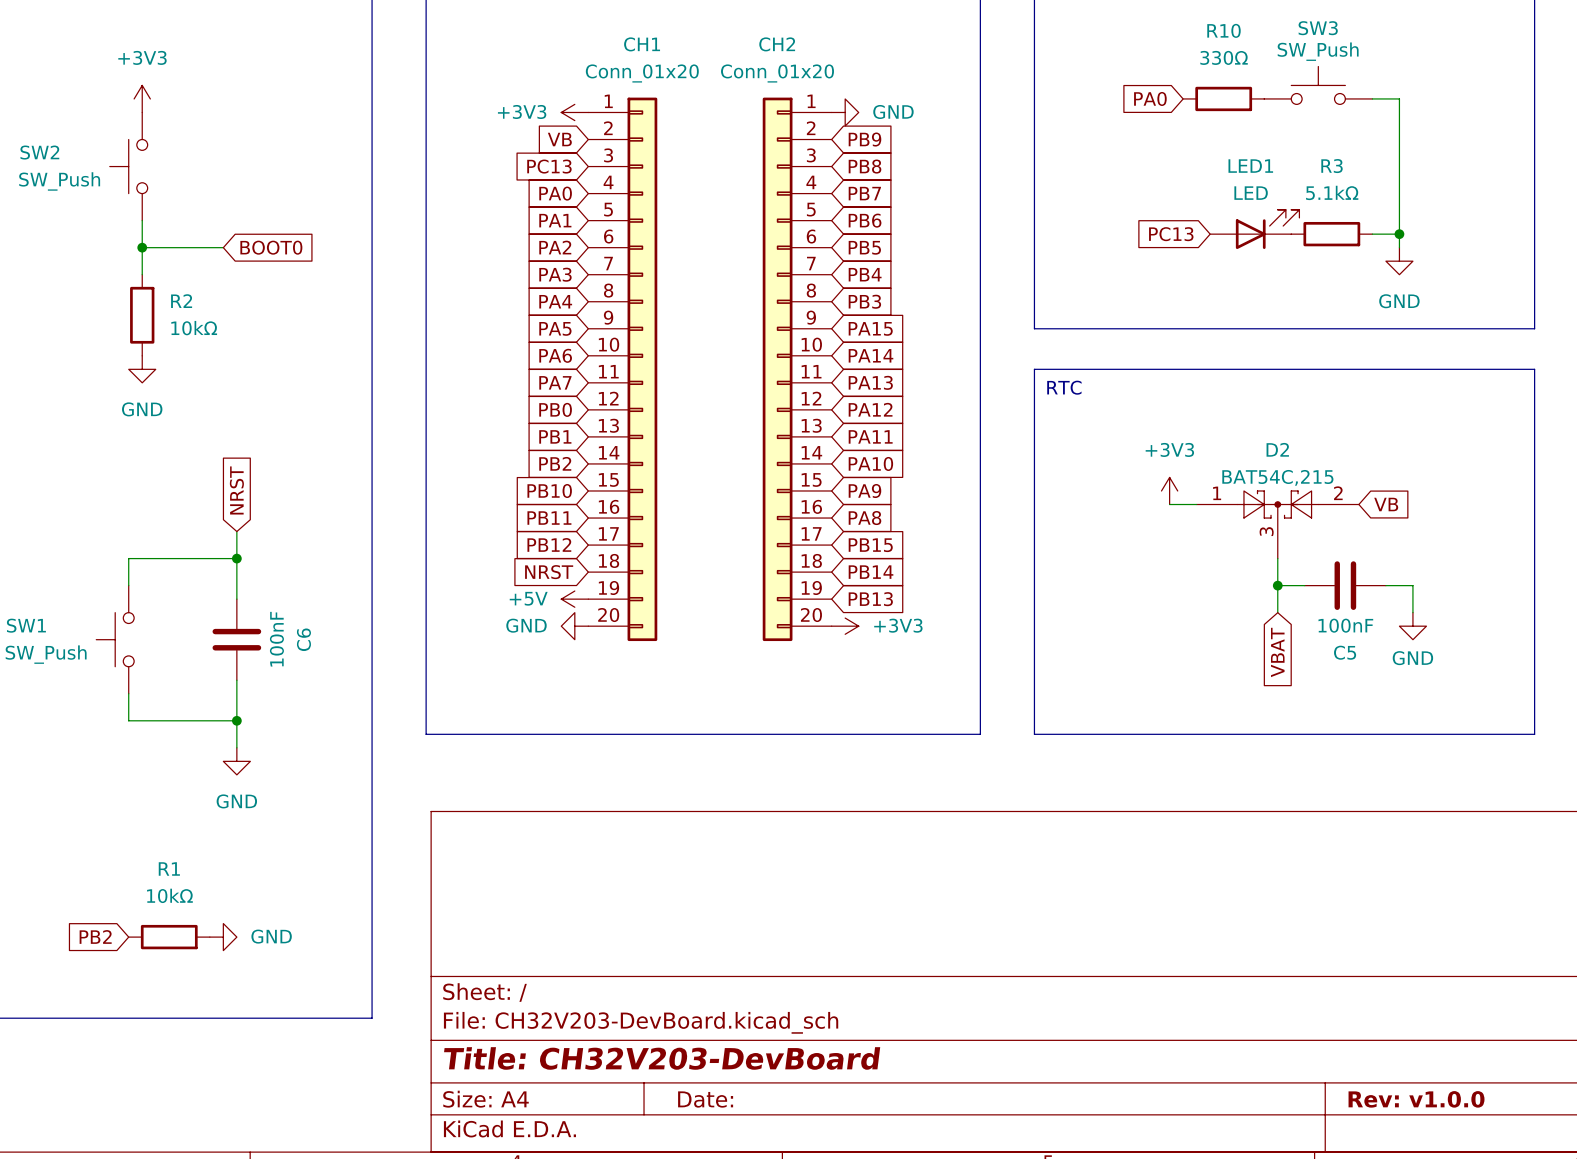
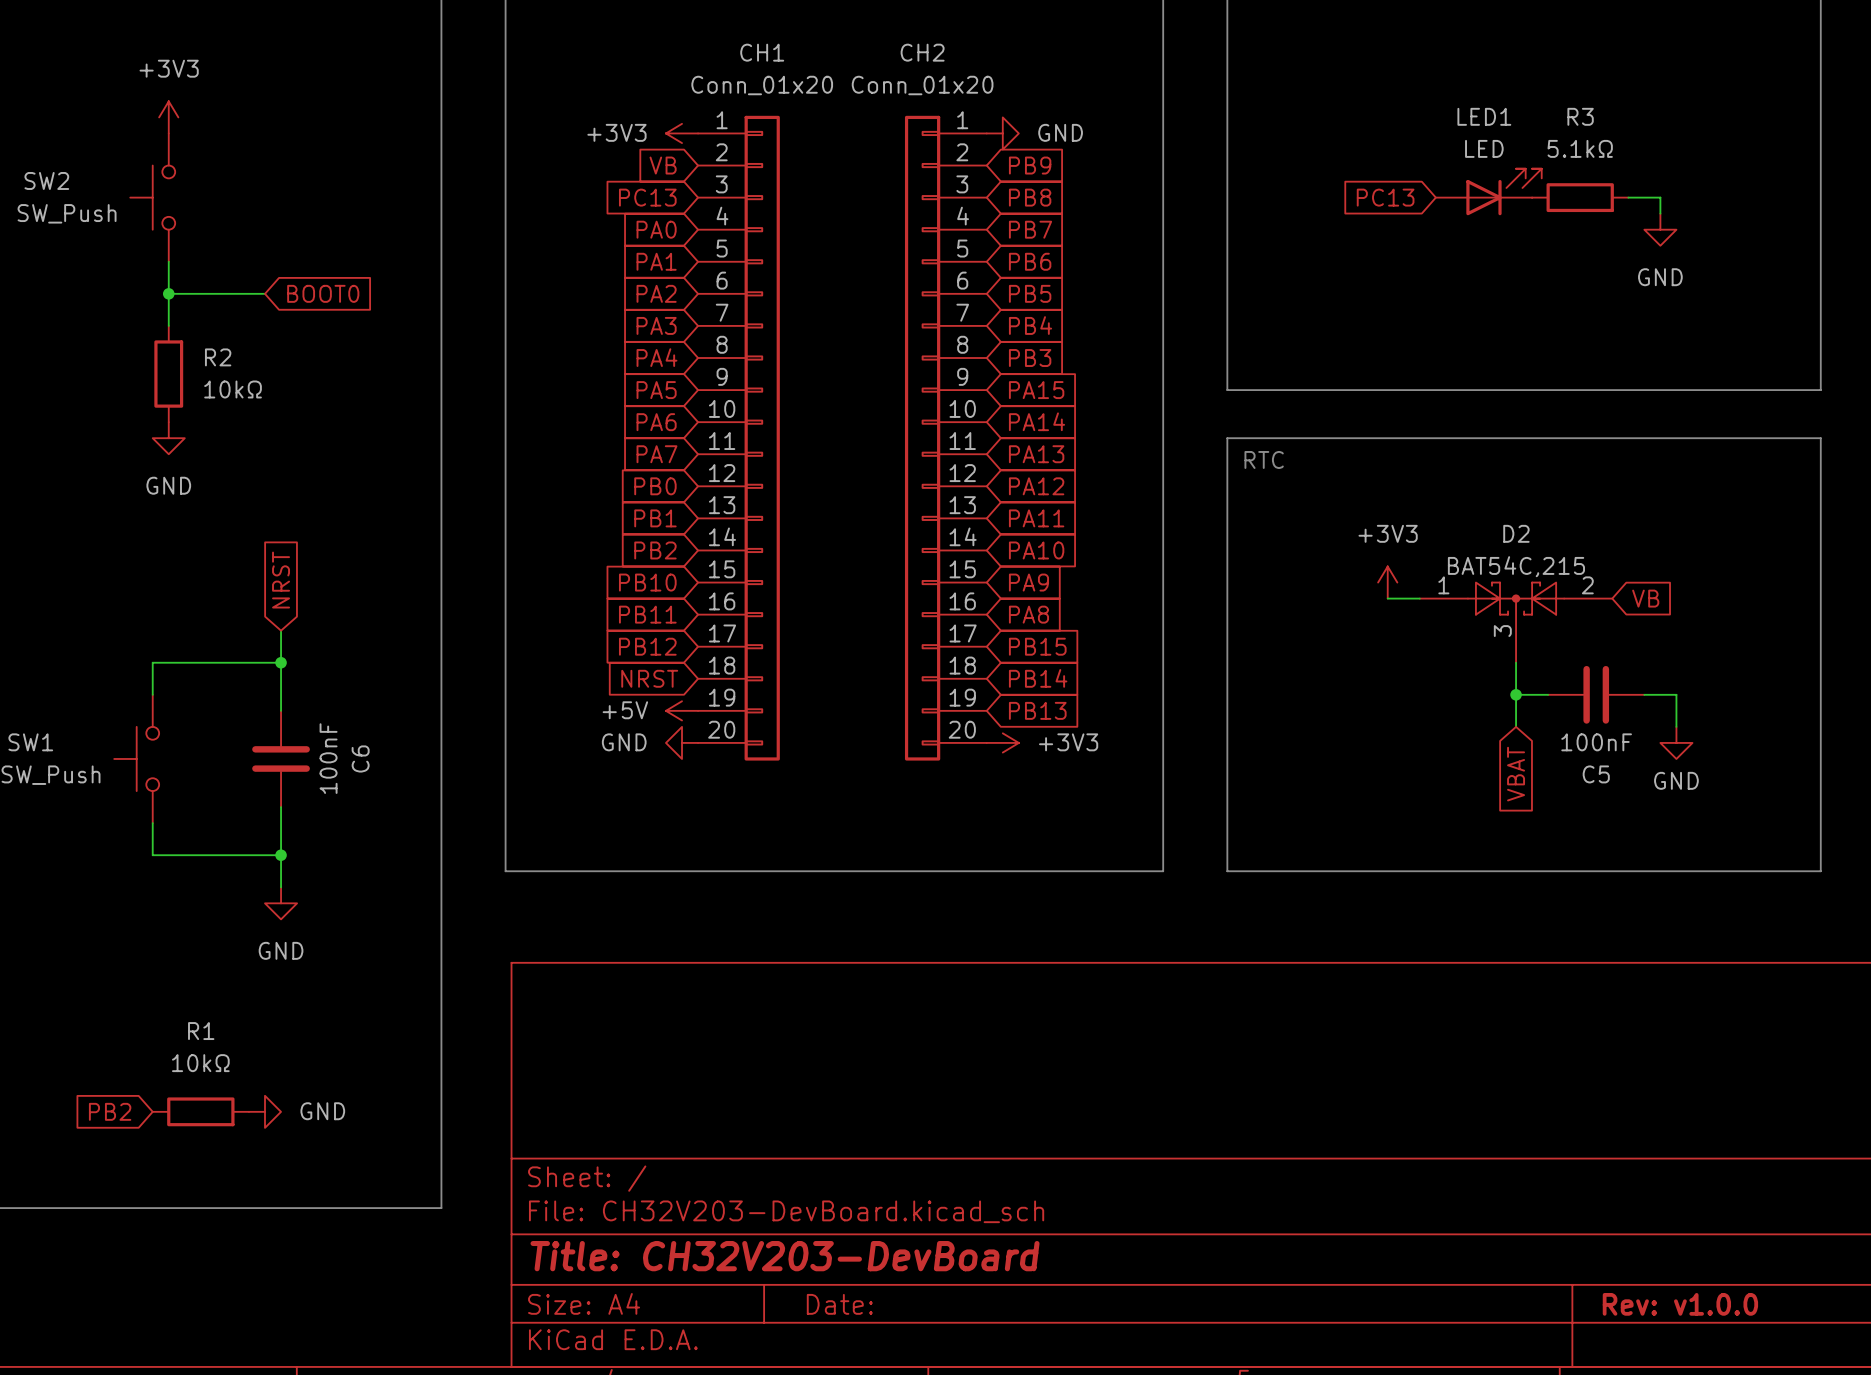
SW3: SW_Push (1318, 85) -> none
global label: PA0 (1150, 98) -> none
R10: 330Ω (1223, 98) -> none
wire: (1372, 98) (1399, 98) (1399, 166) -> (1628, 197) (1660, 197)
wire: (1399, 180) (1399, 247) -> none
LED1 position: (1254, 229) -> (1488, 192)
global label position: PC13 (1171, 234) -> PC13 (1385, 197)
R3 position: (1331, 234) -> (1580, 197)
wire: (1372, 234) (1399, 234) -> none
junction: (1399, 234) -> none
power symbol position: GND (1399, 261) -> GND (1660, 229)

